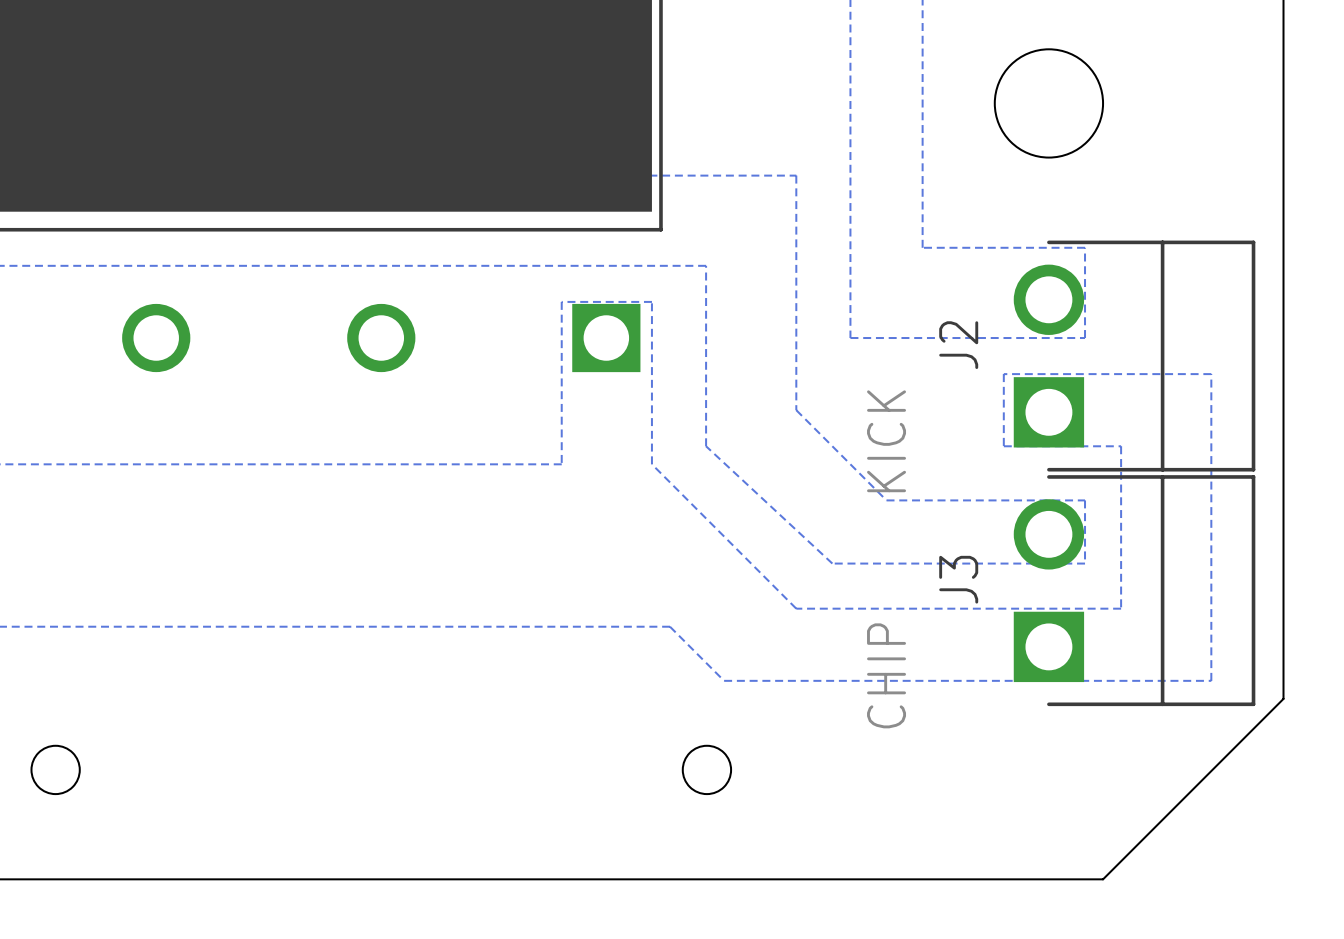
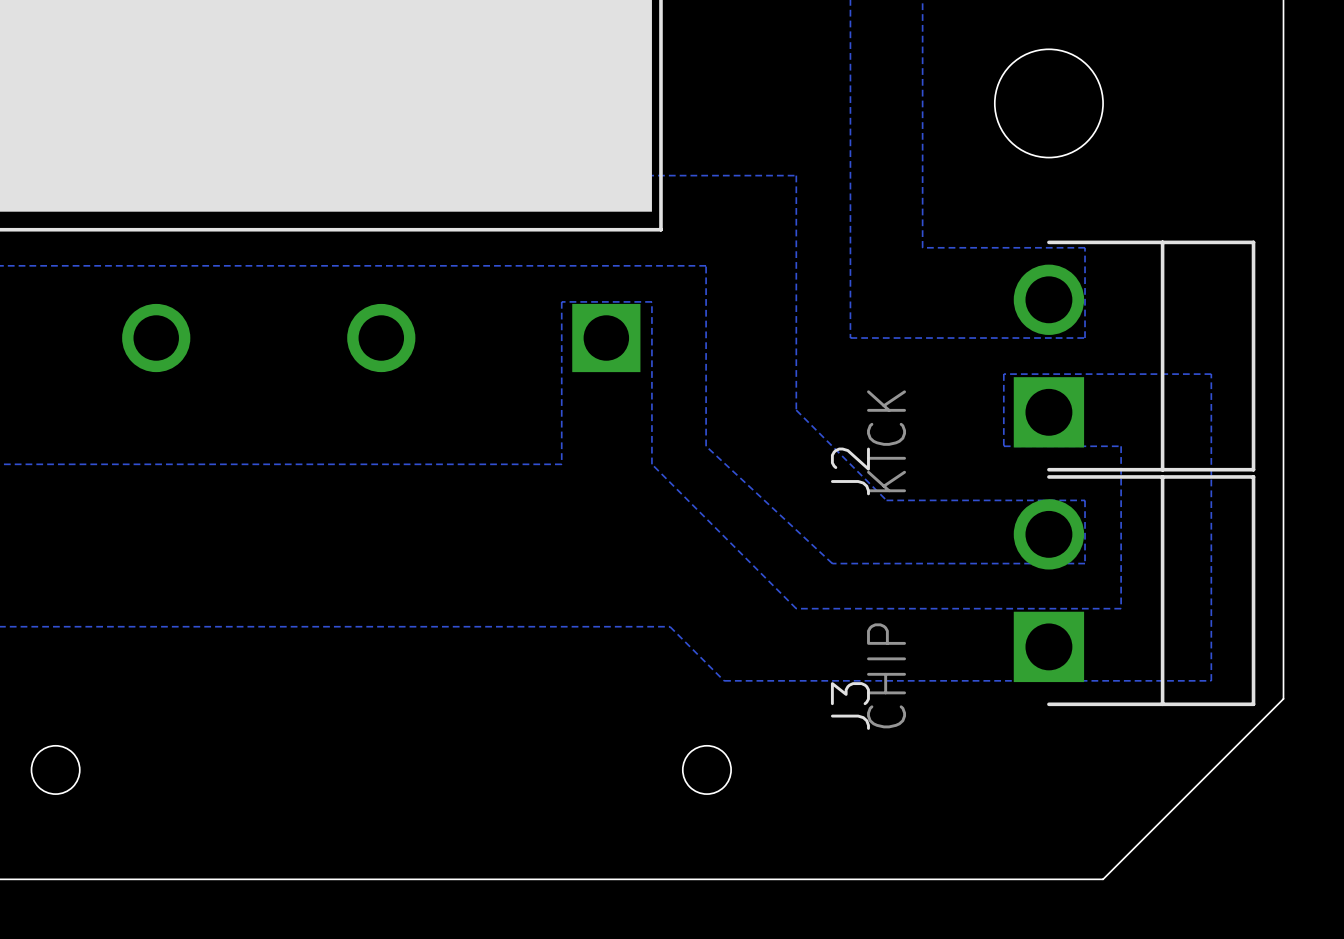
J2 name position: J2 (958, 345) -> J2 (850, 471)
J3 name position: J3 (958, 579) -> J3 (850, 706)

